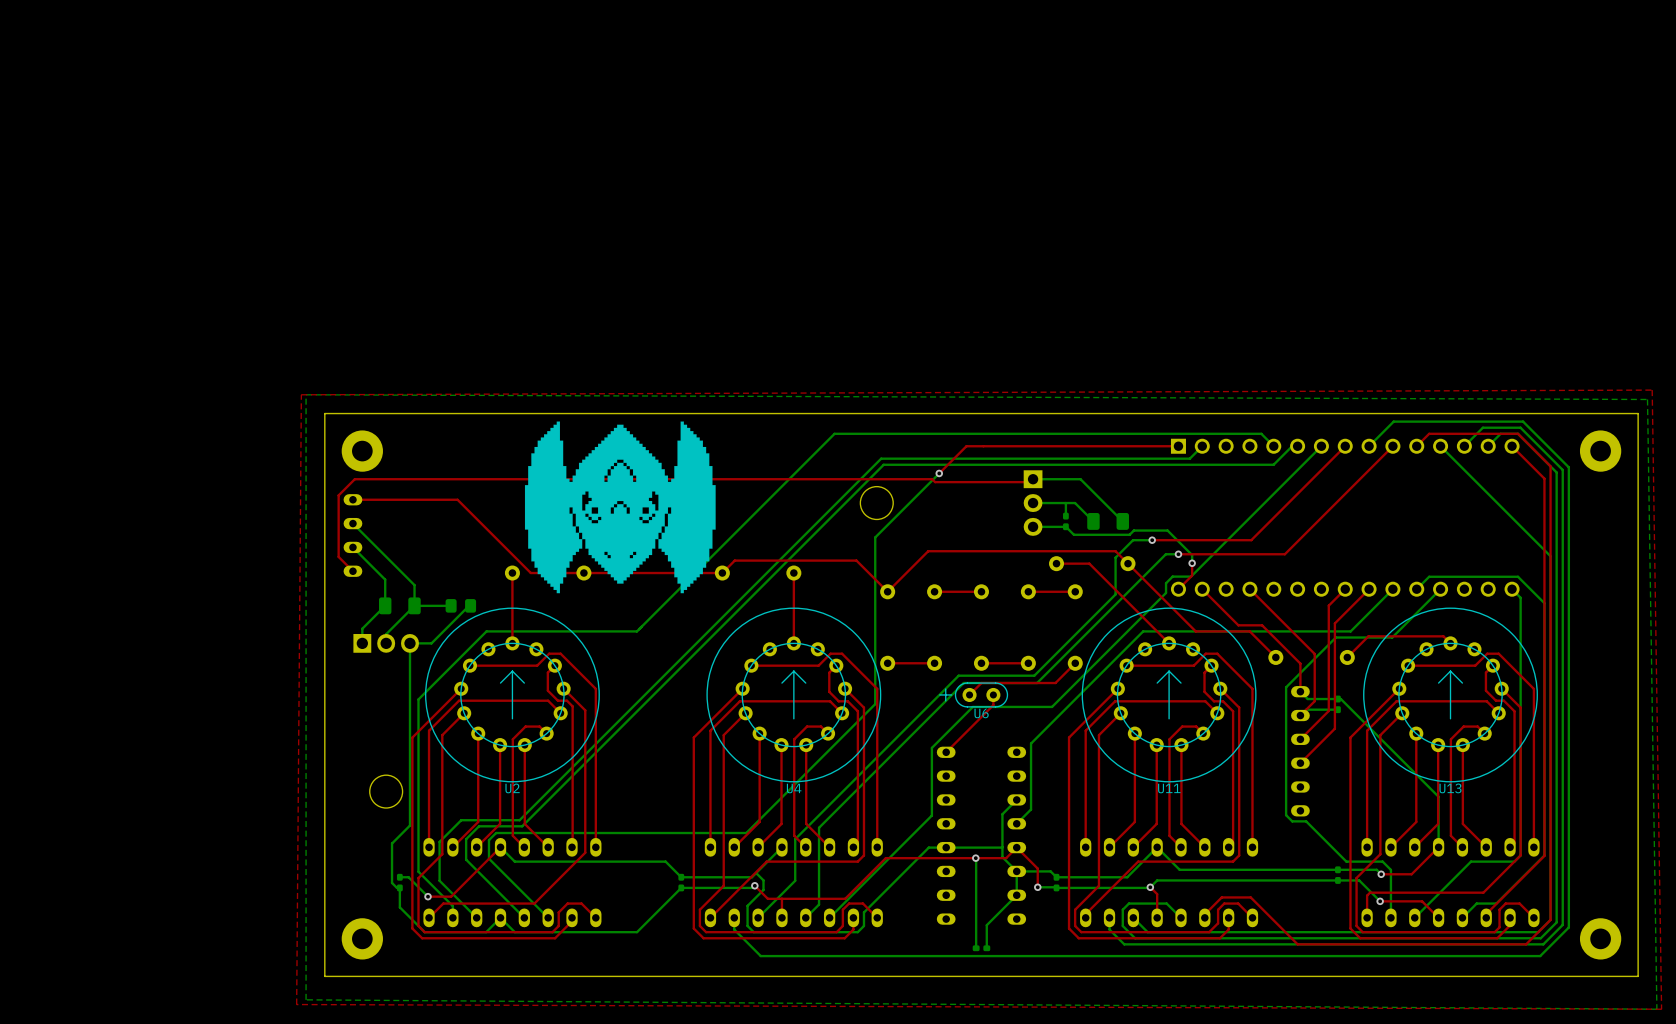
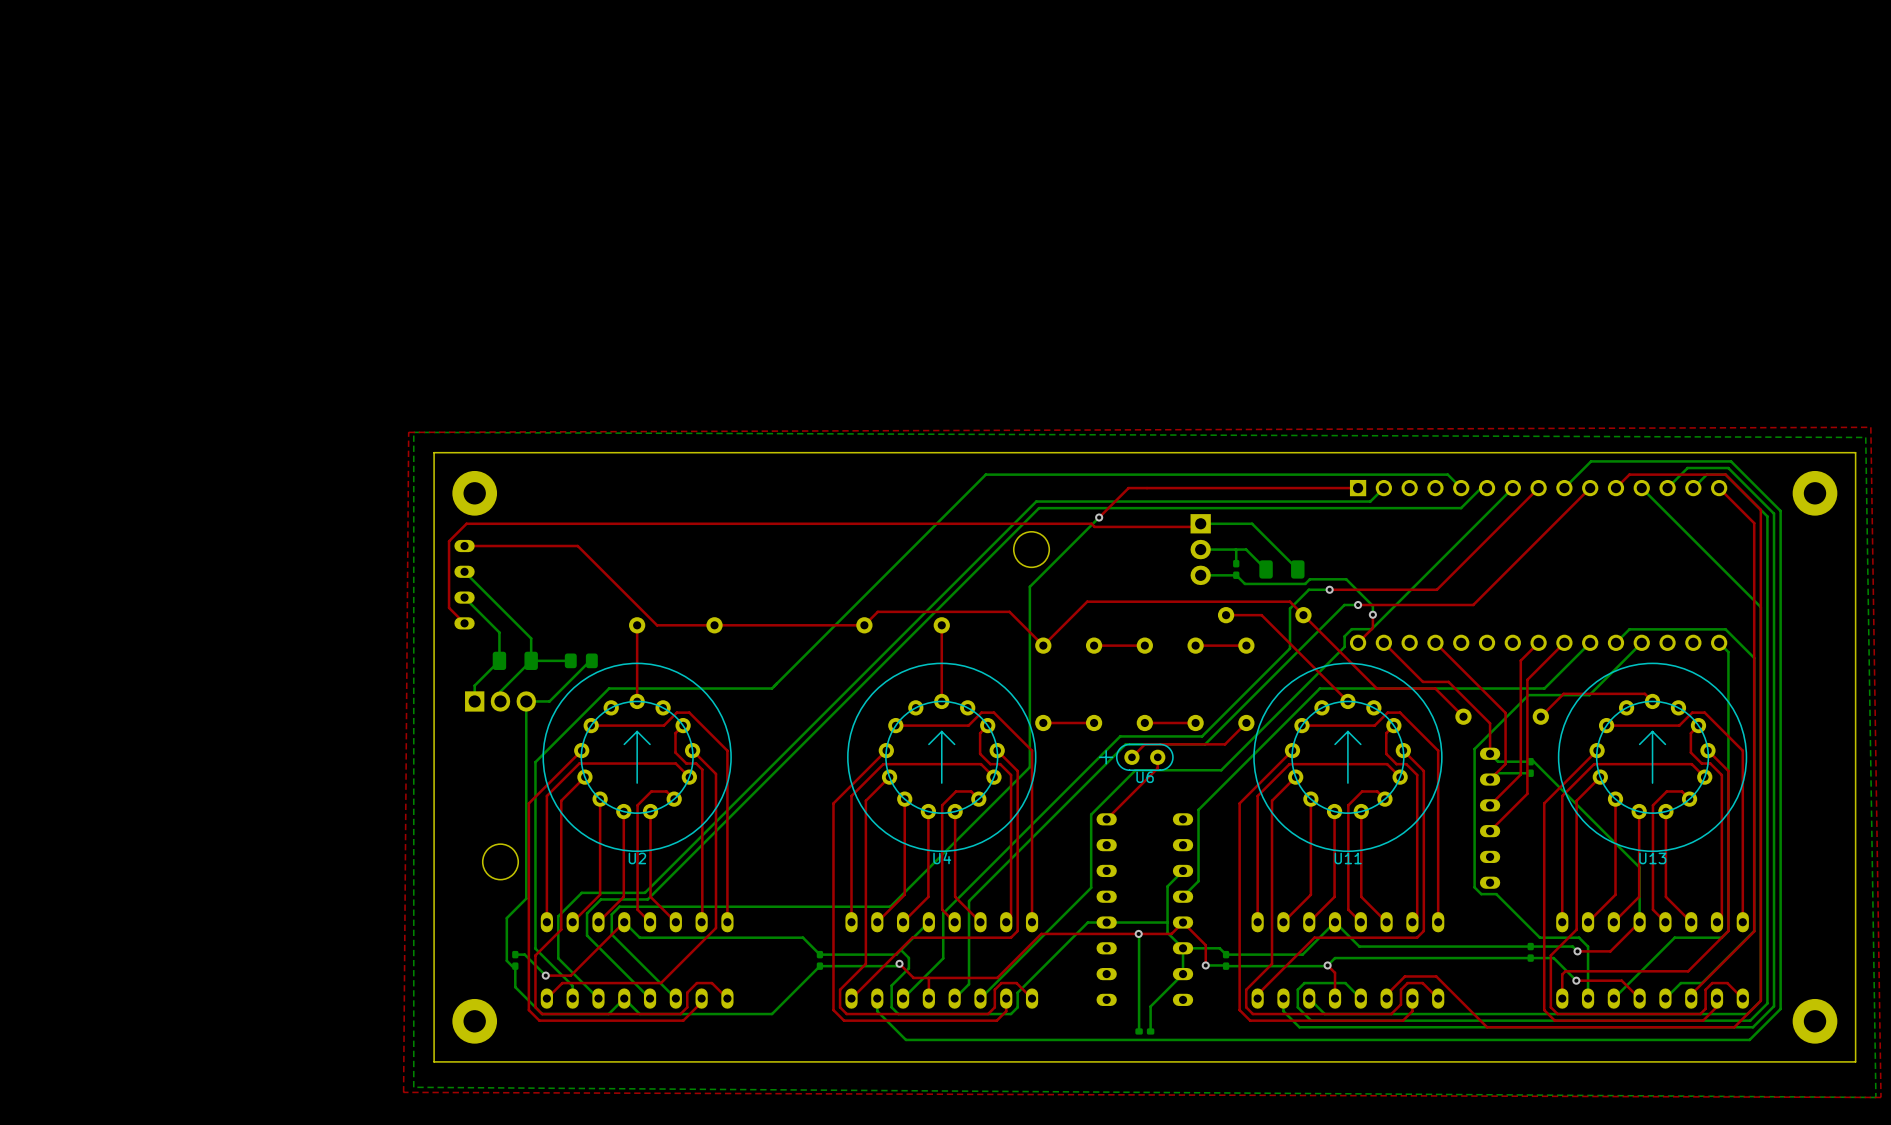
drawing: [524, 421, 716, 594] -> none

